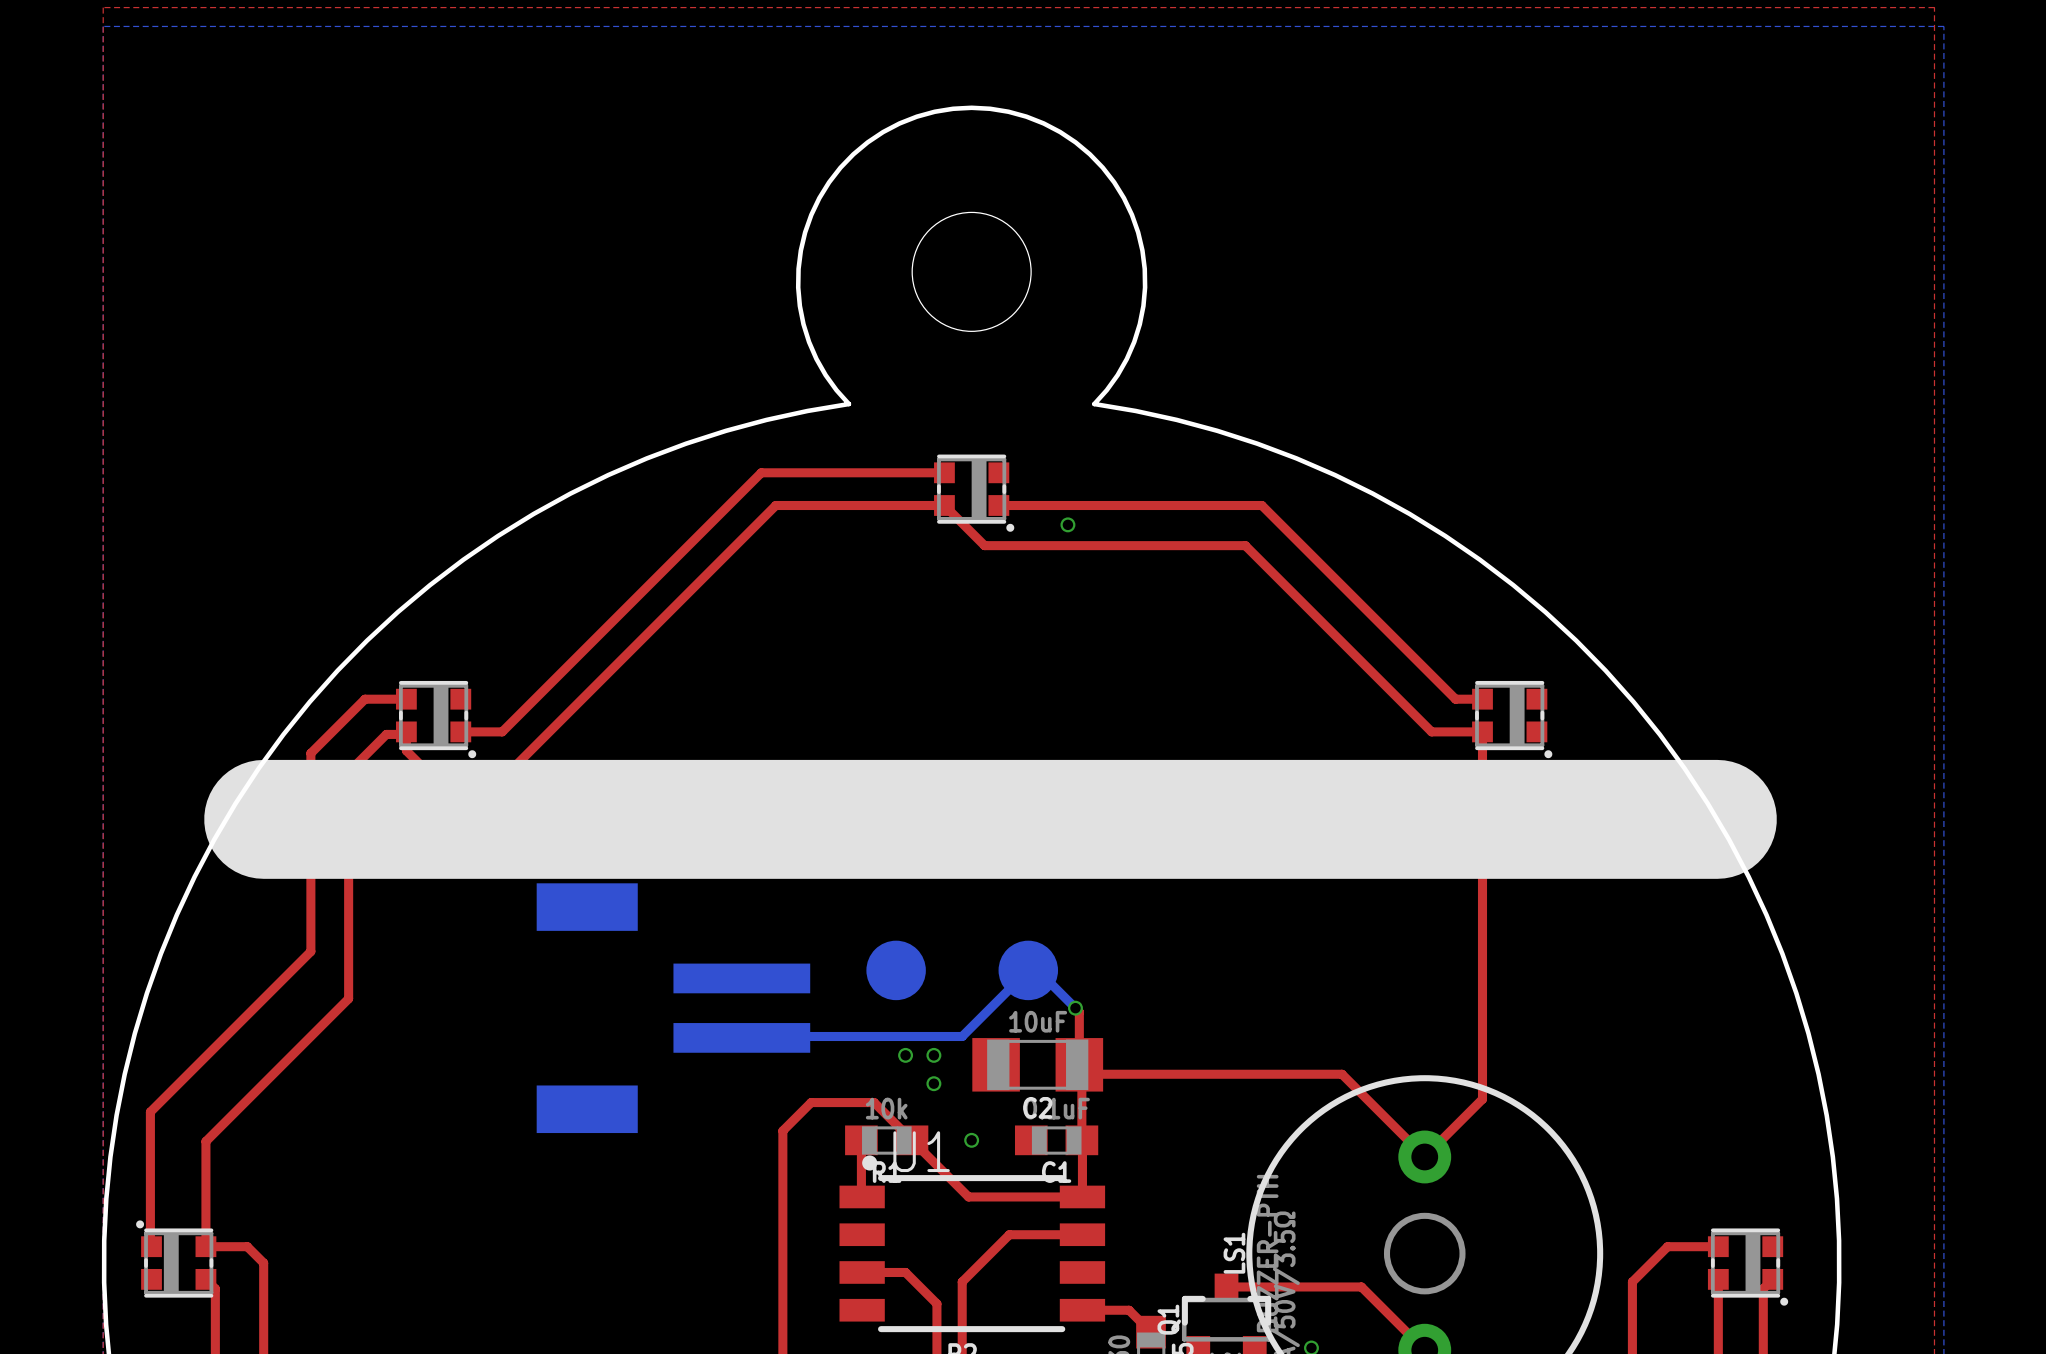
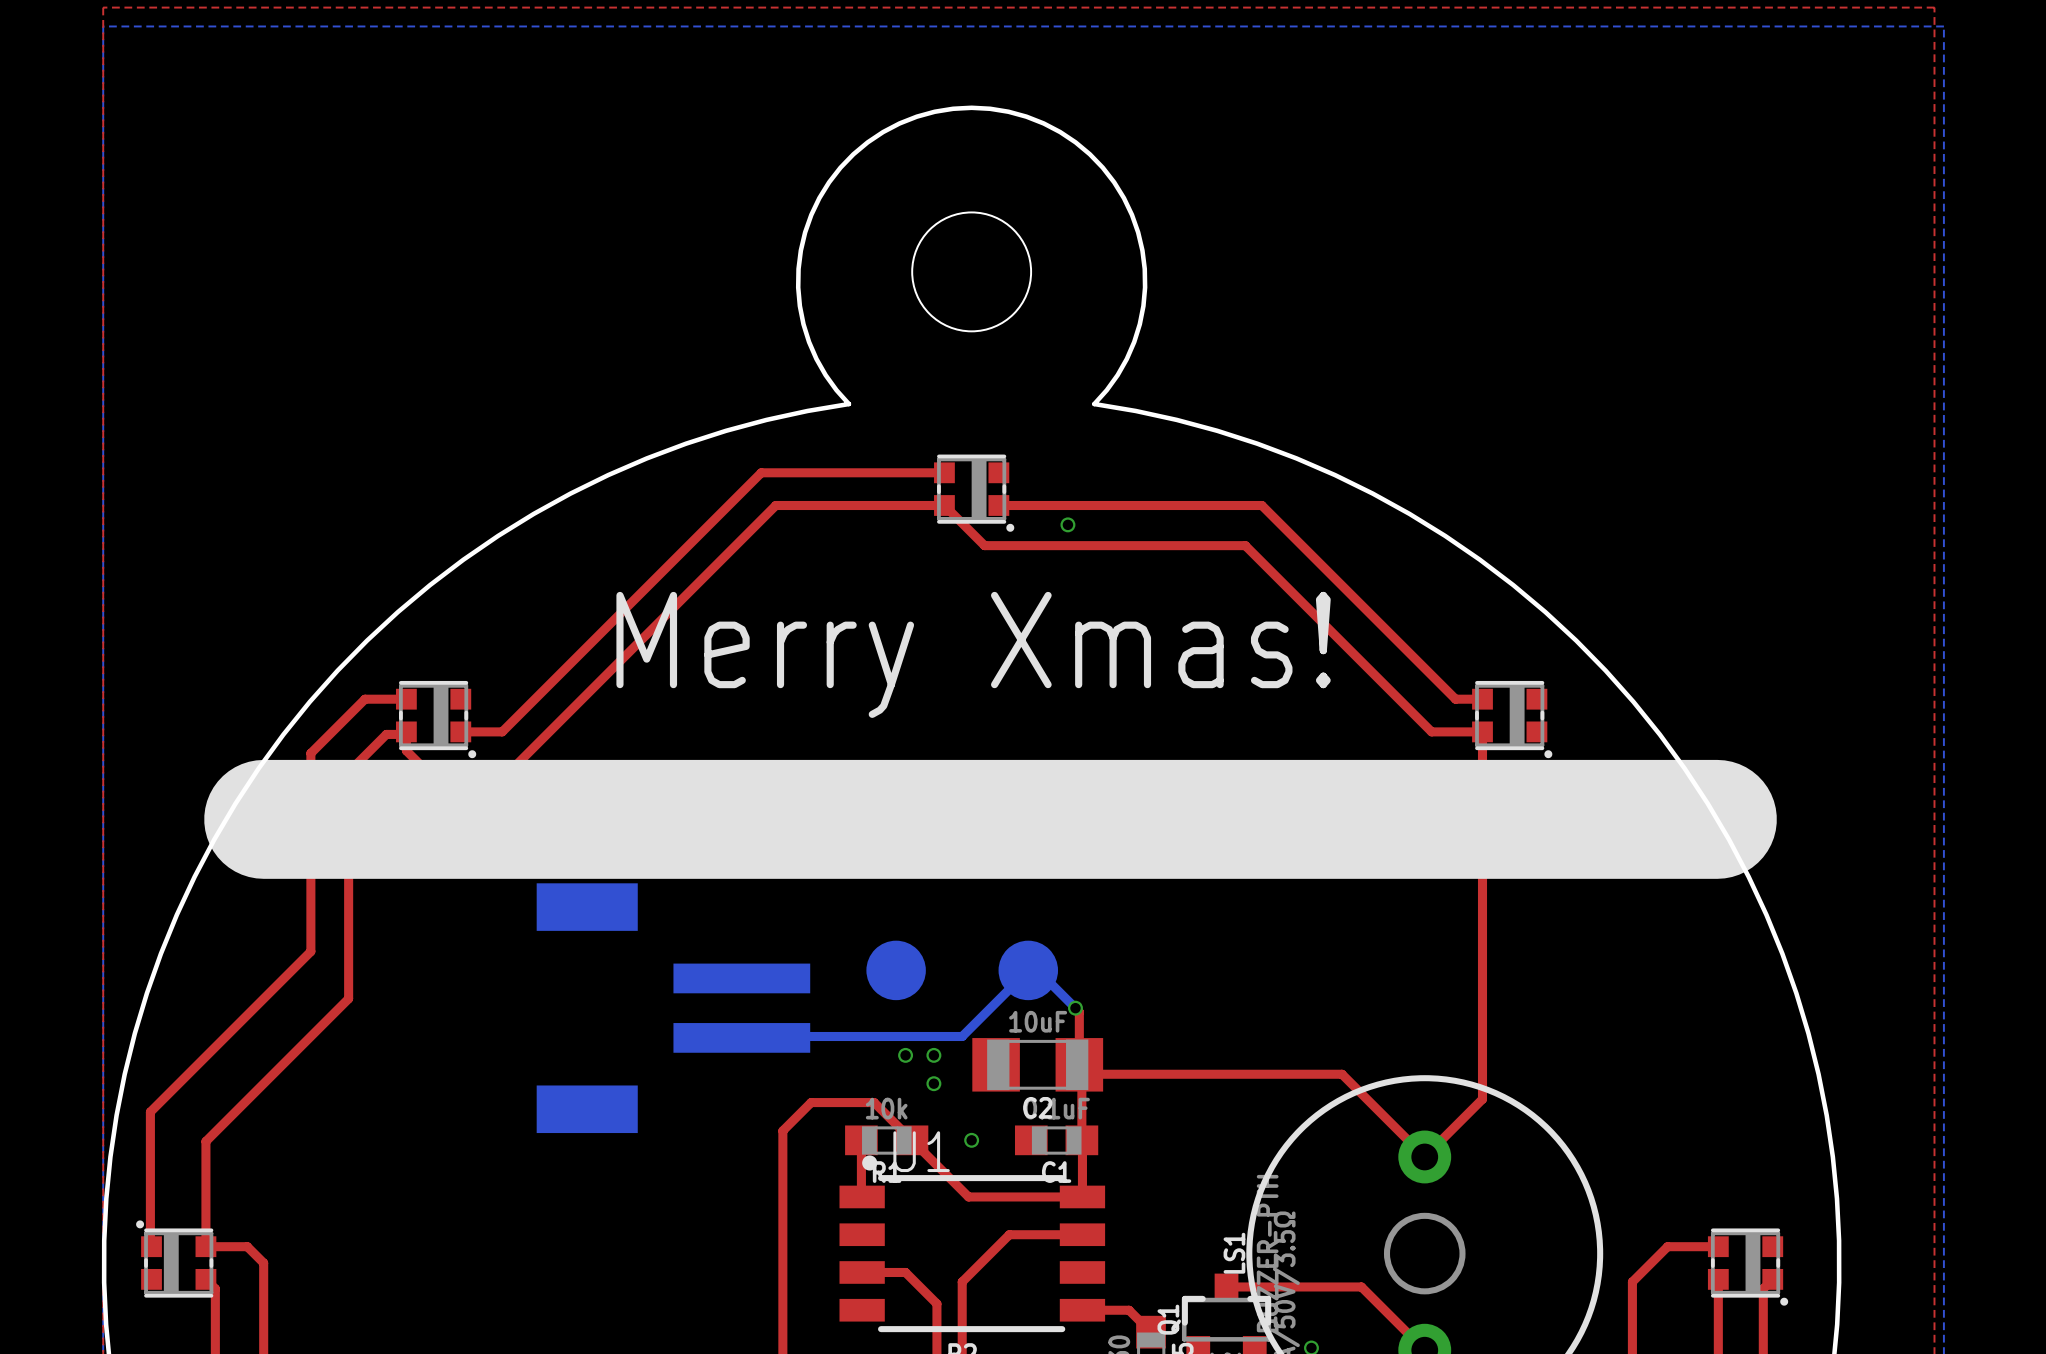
text: none -> Merry Xmas! (973, 654)

